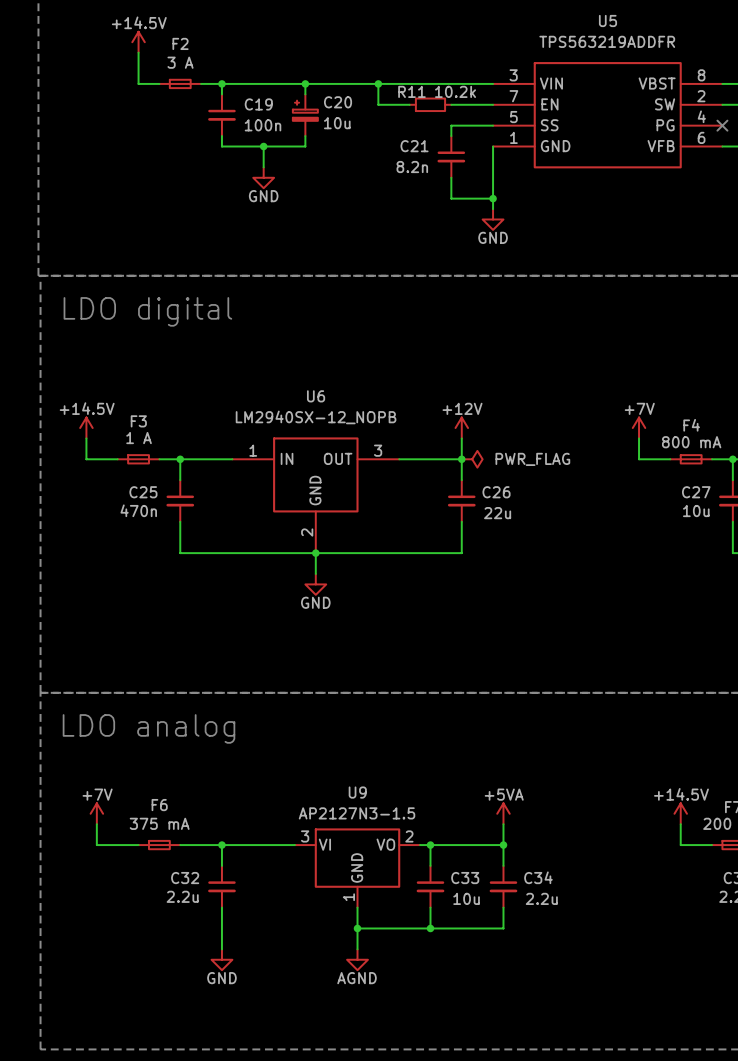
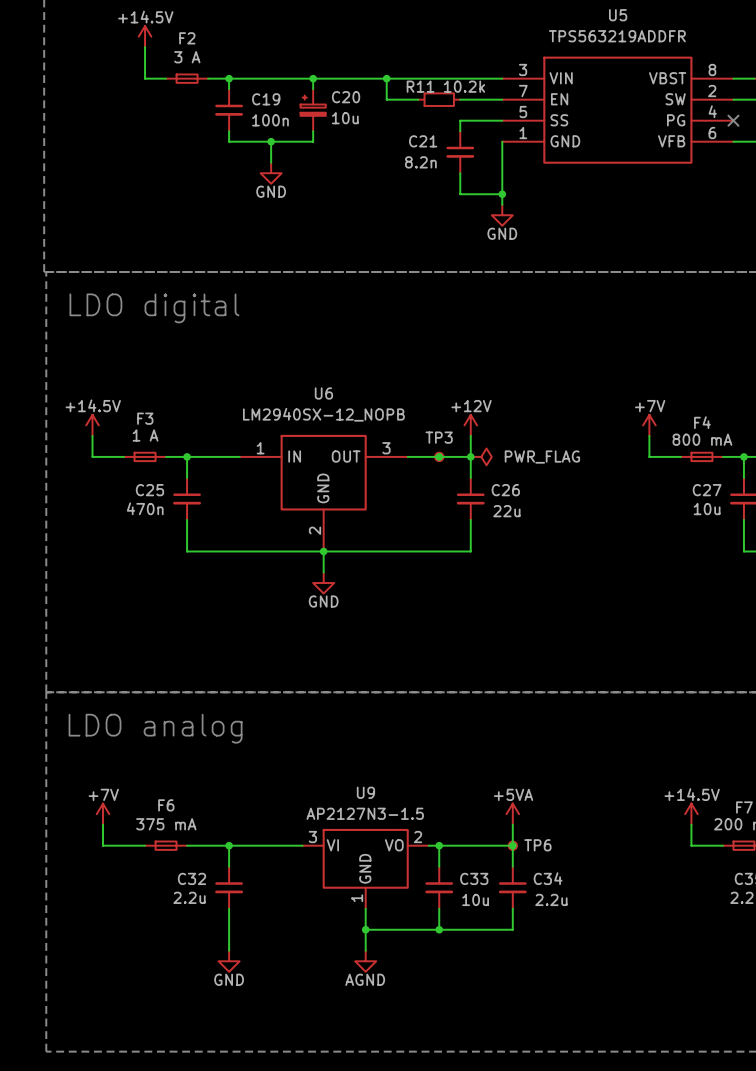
junction: none -> (439, 456)
TP3: none -> (439, 456)
TP6: none -> (512, 845)

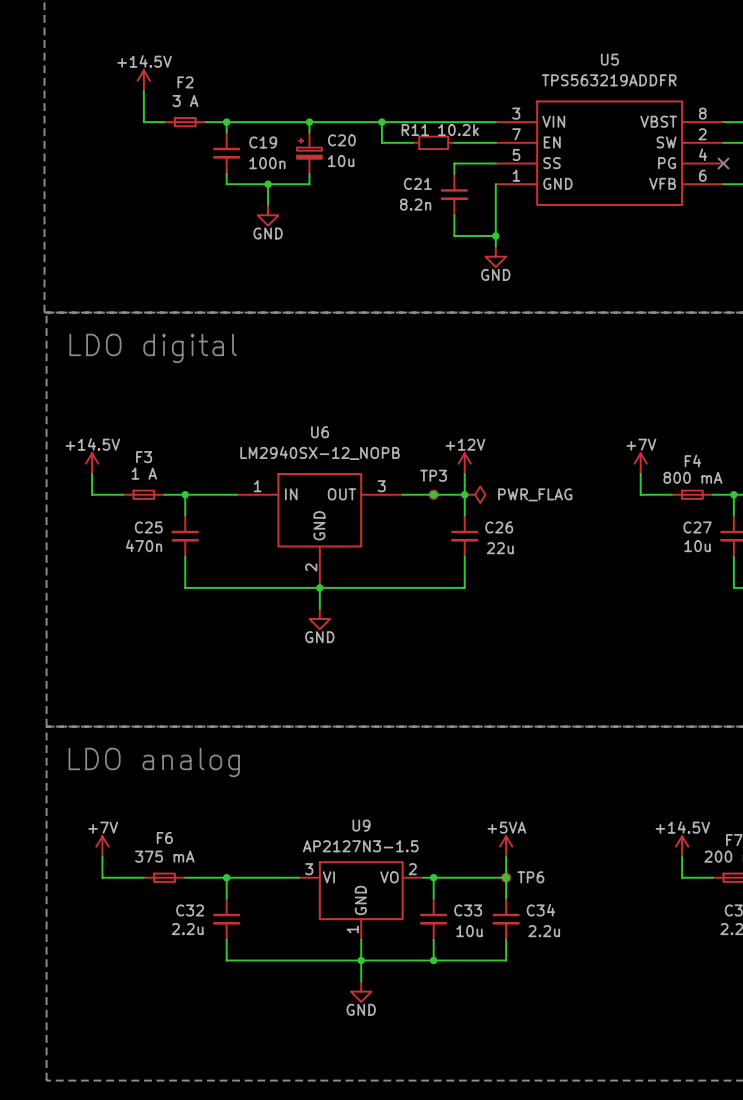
wire: (229, 929) (229, 950) -> (226, 960) (361, 960)
power symbol: GND (229, 961) -> none
power symbol: AGND (365, 961) -> GND (361, 991)

